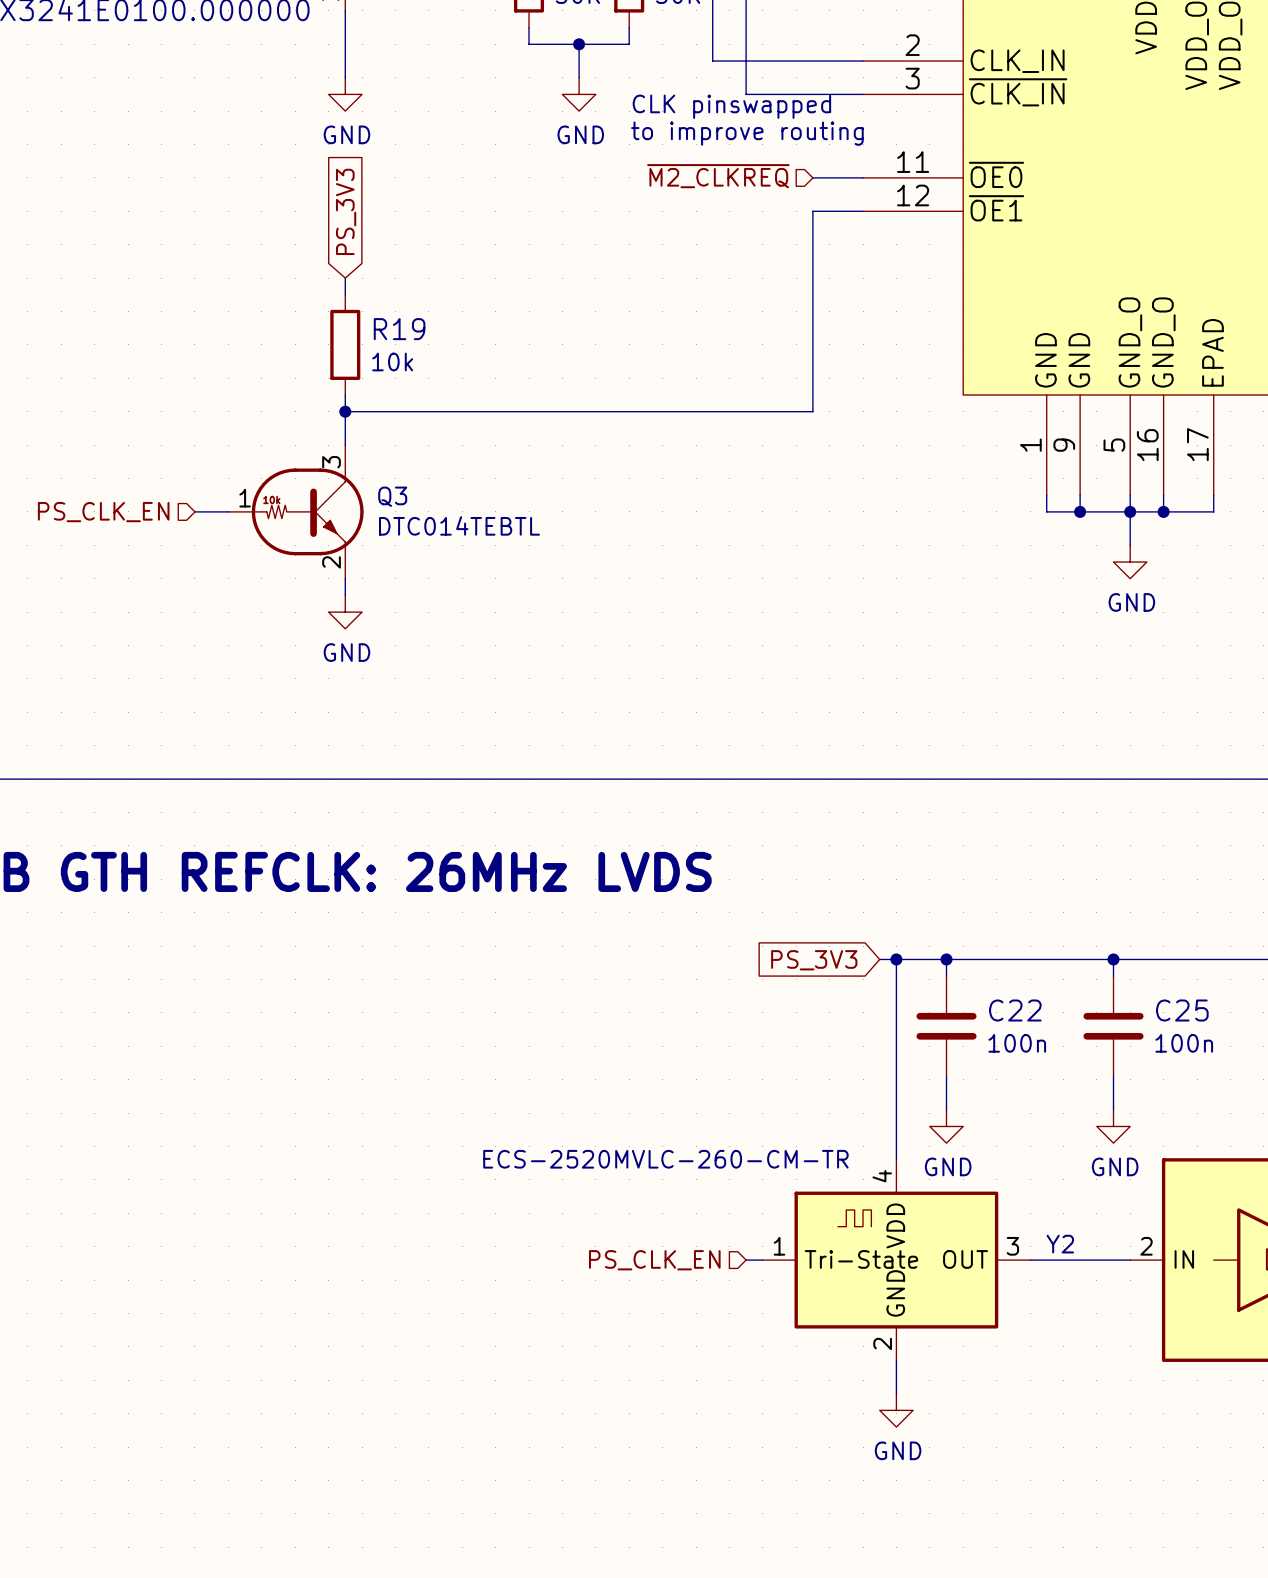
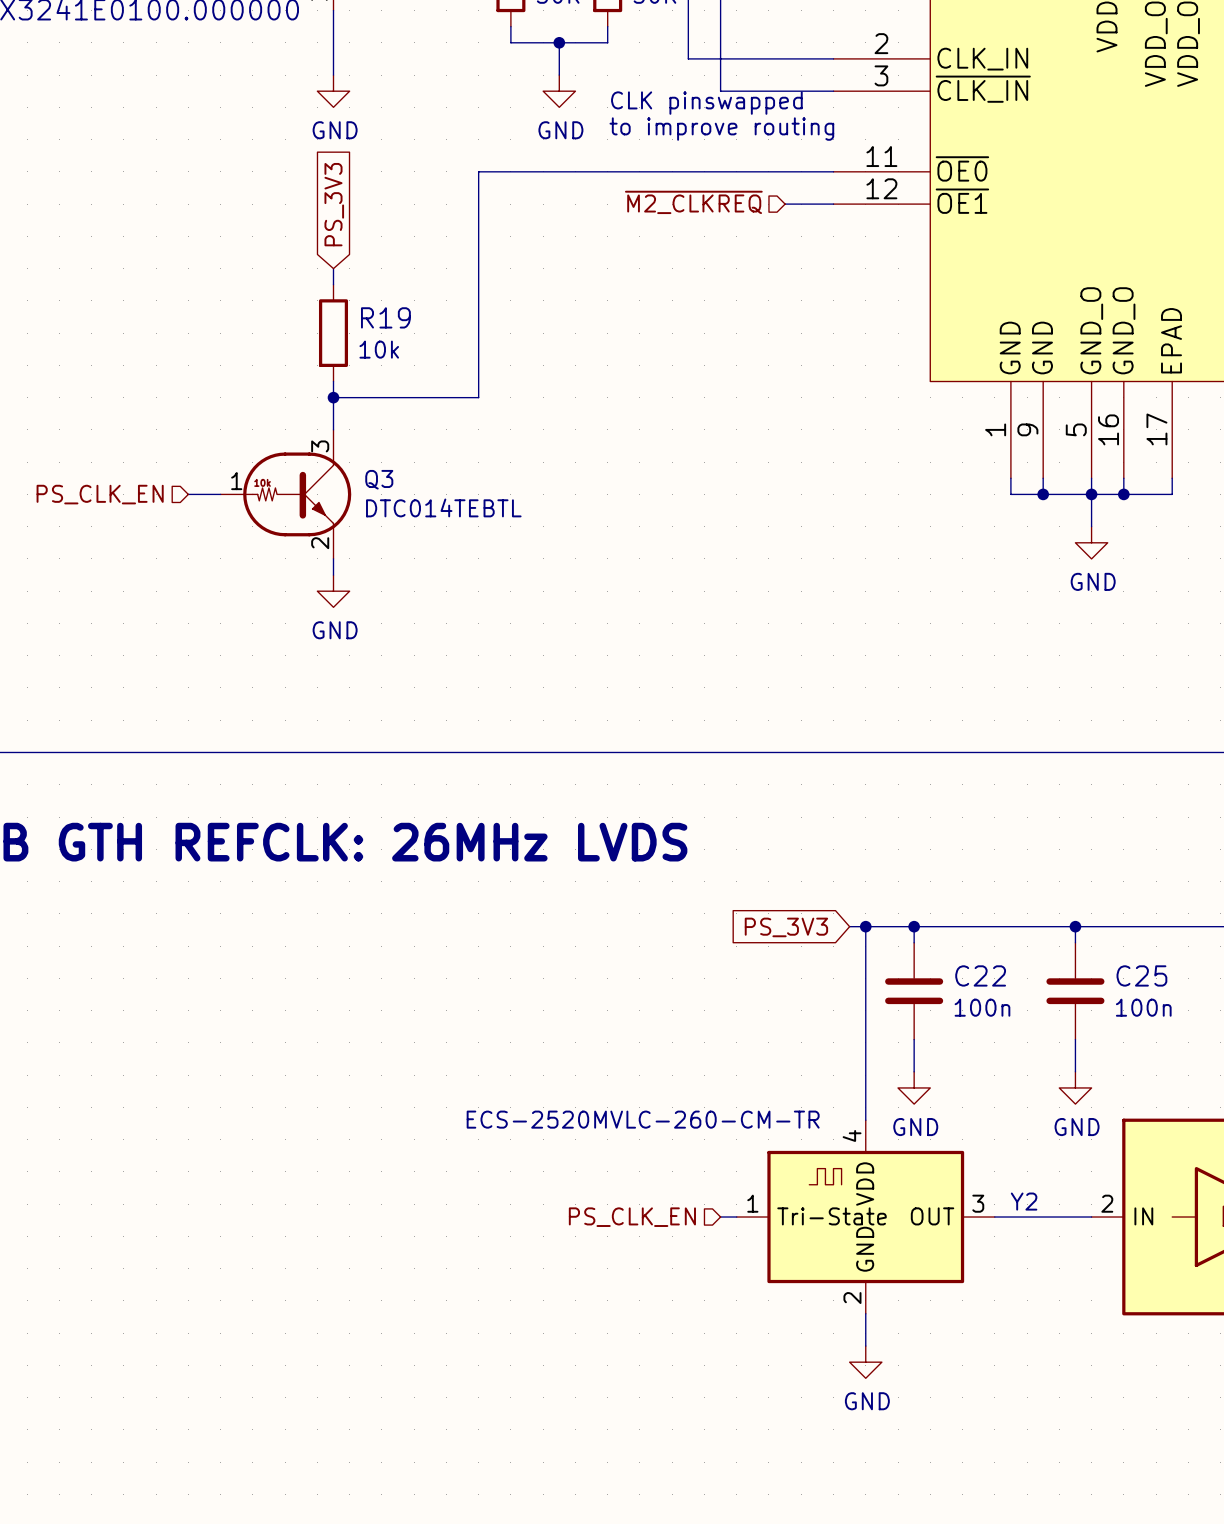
hierarchical label position: ~{M2_CLKREQ} (718, 176) -> ~{M2_CLKREQ} (693, 202)
wire: (812, 211) (812, 411) (495, 411) -> (785, 171) (478, 171) (478, 397)

